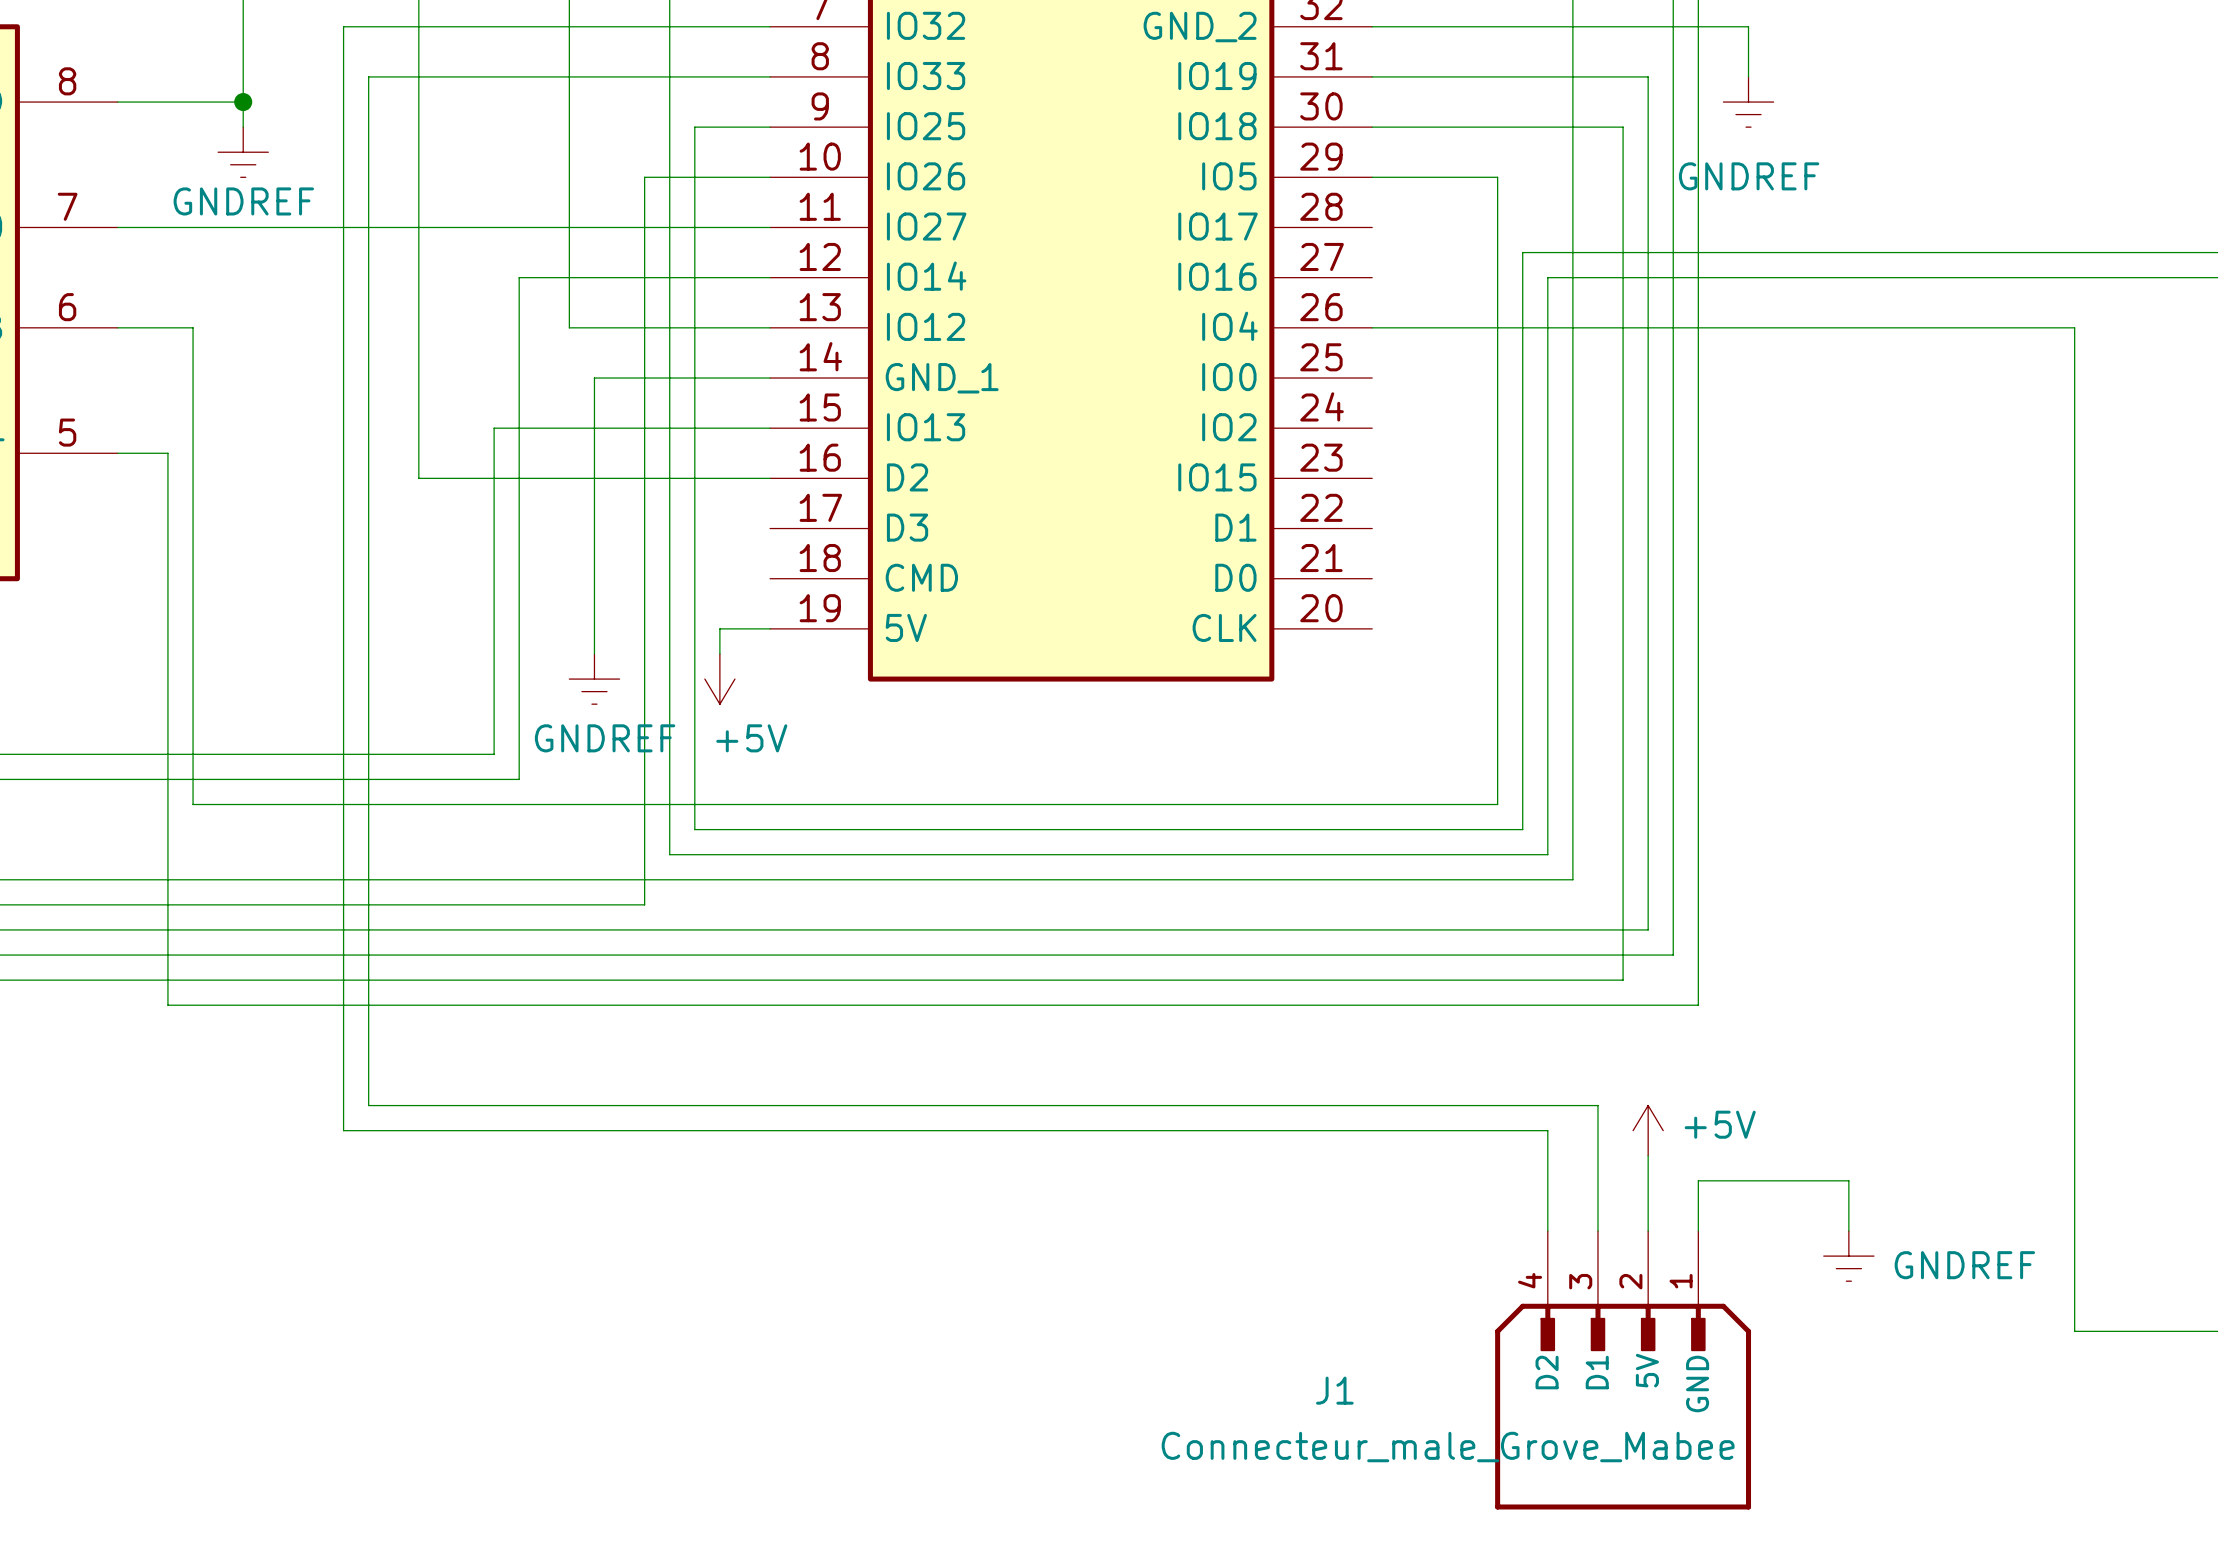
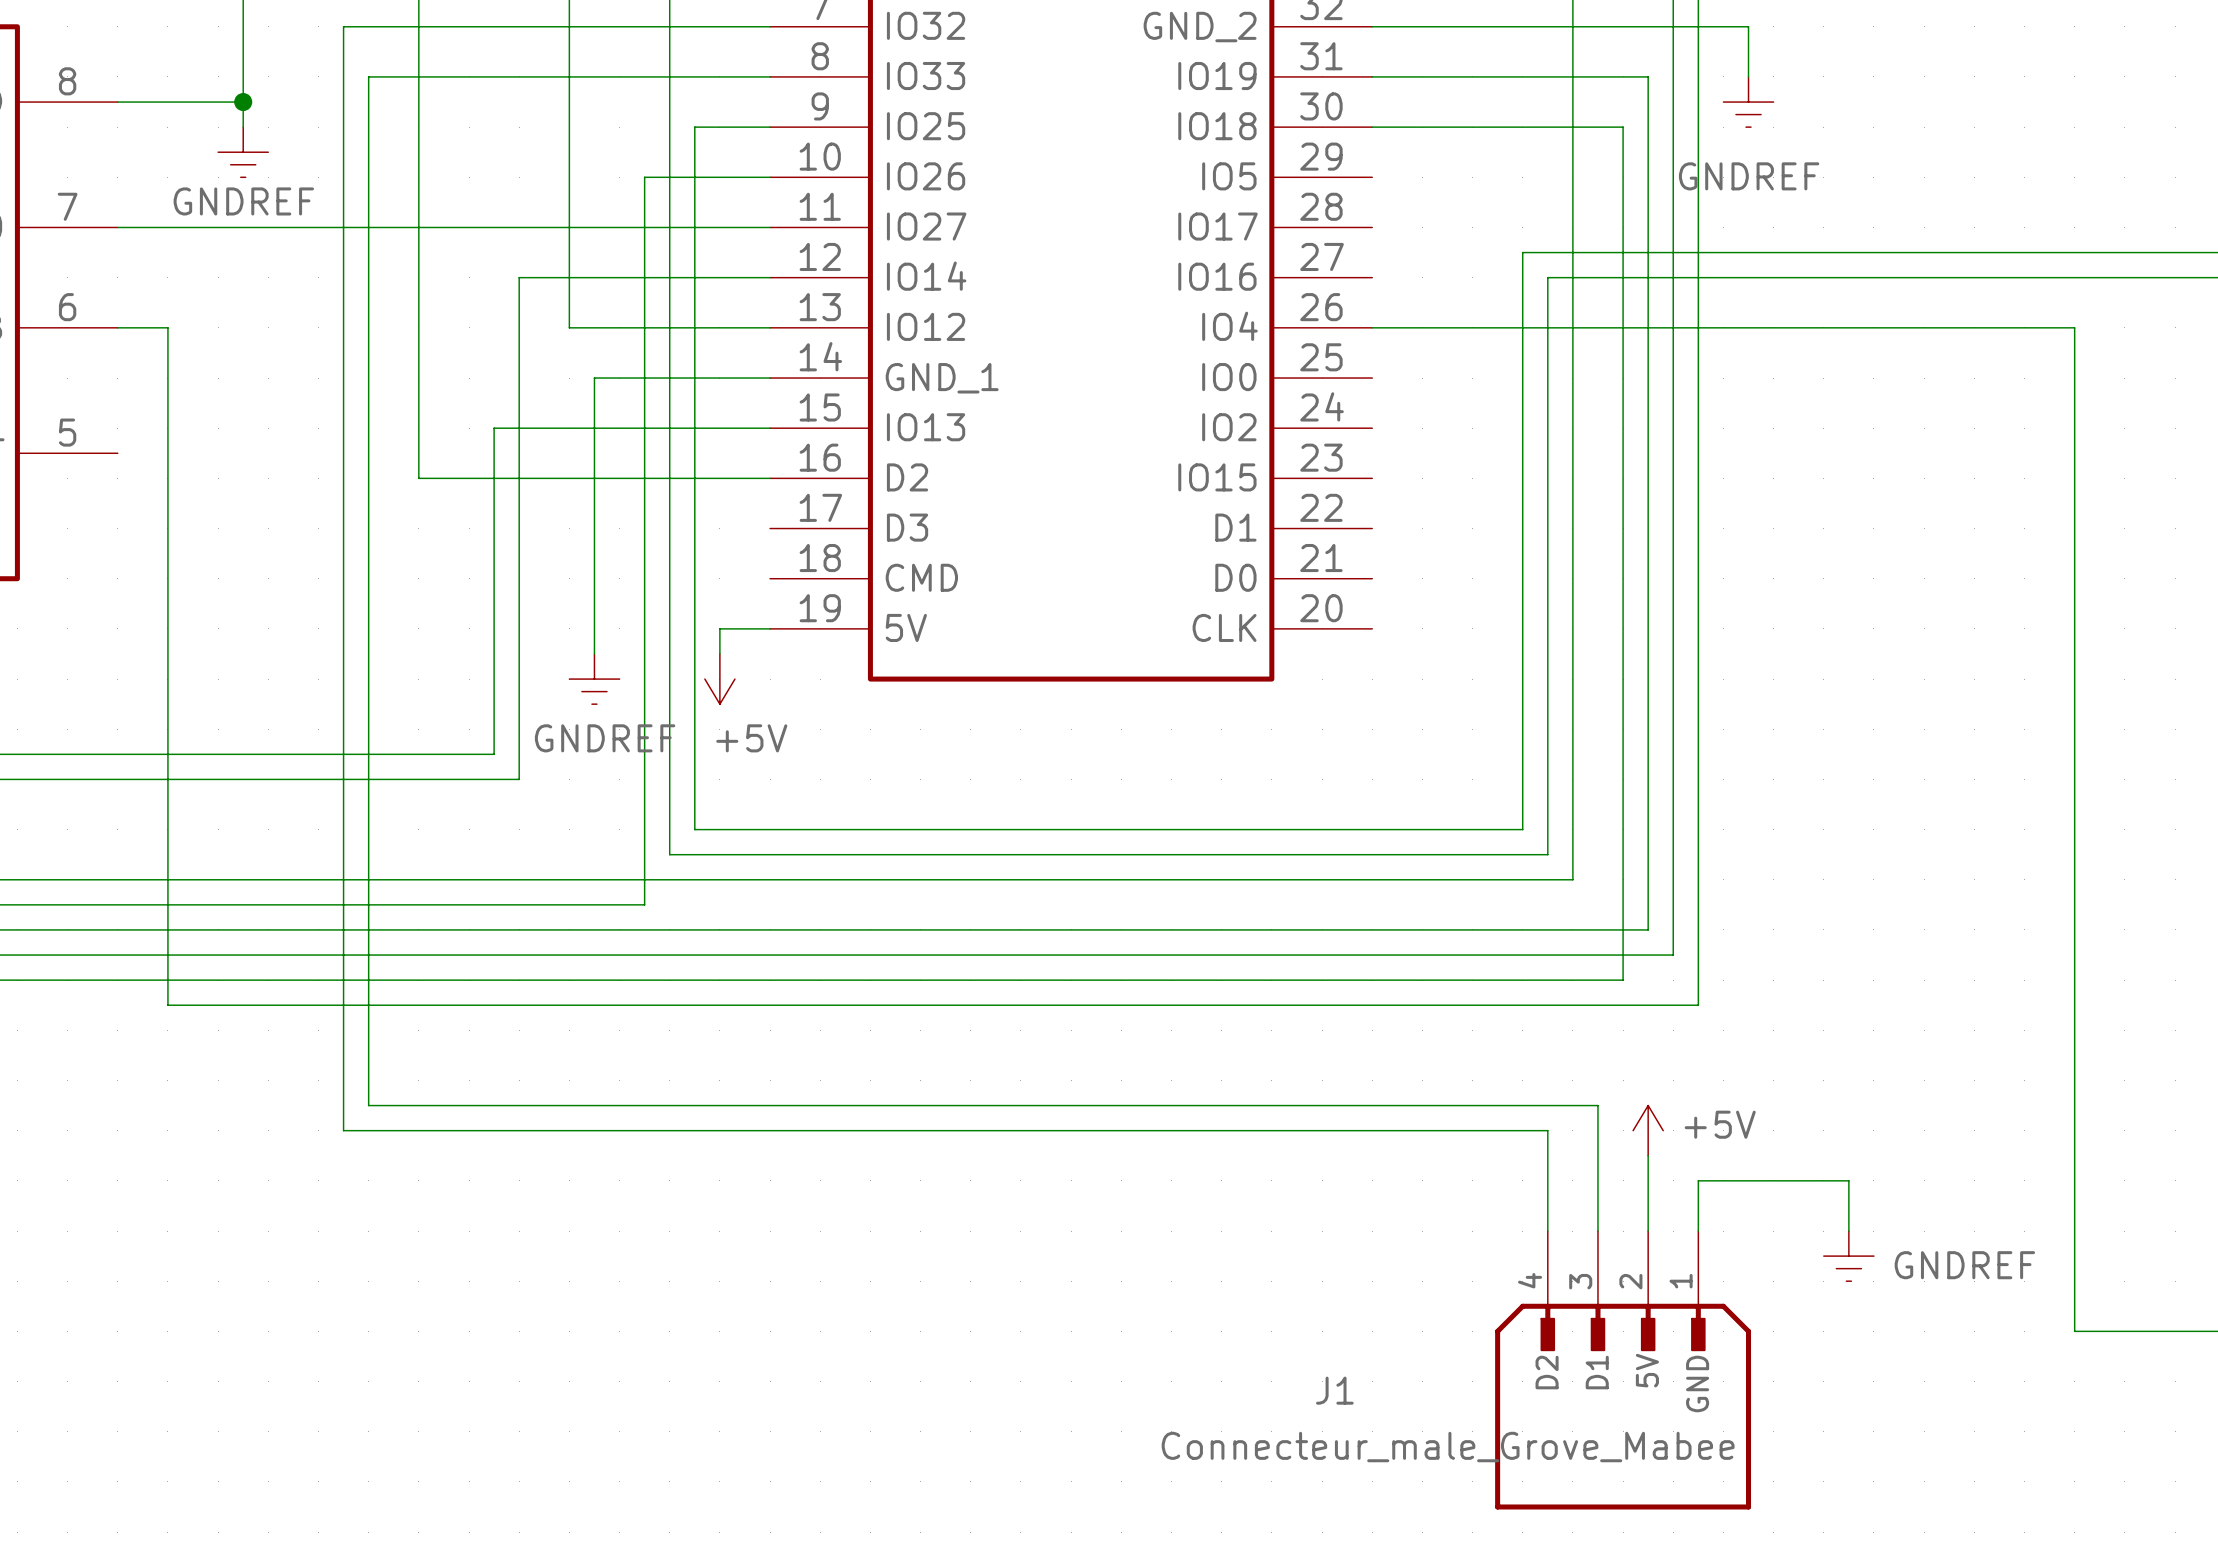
wire: (1372, 177) (1497, 177) (1497, 804) (193, 804) (193, 327) (167, 327) -> none
wire: (117, 453) (167, 453) -> (167, 327) (167, 453)

